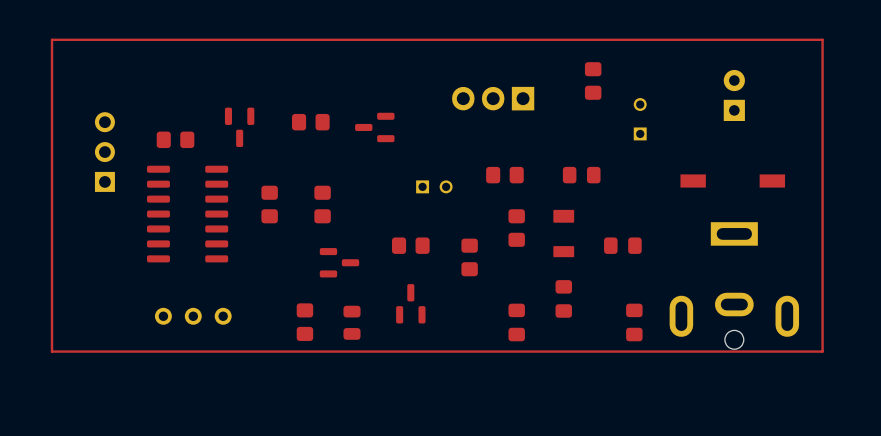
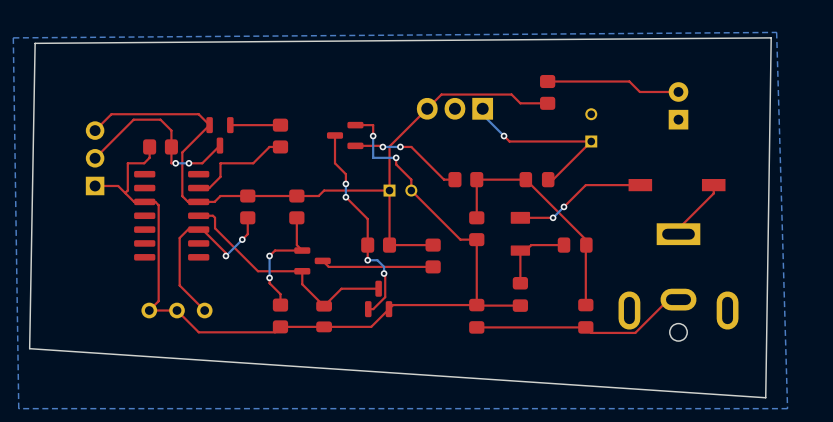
bottom zone outline: none -> (776, 32) (13, 37) (18, 408) (787, 408) (776, 32)
board edge: none -> (771, 37) (765, 397) (29, 348) (35, 43) (771, 37)
top track: (822, 39) (52, 39) (52, 351) (822, 351) (822, 39) -> none
top track: none -> (547, 81) (629, 81) (639, 91) (678, 91)
top track: none -> (547, 103) (520, 103) (511, 94) (441, 94) (389, 146) (389, 245) (433, 245)
bottom track: none -> (482, 108) (482, 114) (504, 136)
top track: none -> (280, 125) (230, 125)
top track: none -> (355, 125) (373, 125) (373, 136)
top track: none -> (95, 130) (111, 114) (198, 114) (209, 125) (182, 152) (182, 196) (188, 201) (214, 201) (220, 196) (318, 196) (324, 190) (389, 190)
part rotation: 0° (310, 122) -> 90° clockwise (280, 136)
top track: none -> (335, 135) (335, 163) (345, 174) (345, 183)
bottom track: none -> (373, 136) (373, 157) (396, 157)
via: none -> (373, 136)
top track: none -> (504, 136) (509, 141) (591, 141) (553, 179) (548, 179)
via: none -> (504, 136)
top track: none -> (219, 145) (202, 163) (188, 163)
top track: none -> (355, 145) (382, 147)
top track: none -> (149, 146) (149, 157) (144, 163) (127, 163) (127, 190) (125, 193)
top track: none -> (280, 146) (269, 146) (253, 163) (220, 163) (220, 176) (209, 188) (198, 188)
via: none -> (382, 147)
top track: none -> (400, 146) (411, 146) (444, 179) (454, 179)
bottom track: none -> (400, 146) (382, 146)
via: none -> (400, 146)
top track: none -> (396, 157) (396, 164) (411, 179) (411, 190) (460, 239) (476, 239) (476, 305)
via: none -> (396, 157)
top track: none -> (95, 158) (133, 119) (160, 119) (171, 130) (171, 163) (175, 163)
via: none -> (175, 163)
bottom track: none -> (188, 163) (175, 163)
via: none -> (188, 163)
bottom track: none -> (345, 183) (345, 197)
via: none -> (345, 183)
top track: none -> (640, 185) (585, 185) (564, 206)
top track: none -> (713, 185) (713, 193) (678, 228) (678, 234)
top track: none -> (95, 185) (118, 185) (134, 201) (155, 201) (158, 205) (158, 301) (149, 310) (176, 310) (198, 332) (275, 332) (280, 326) (371, 326) (393, 305) (476, 305)
top track: none -> (345, 197) (367, 219) (367, 260)
via: none -> (345, 197)
bottom track: none -> (564, 206) (553, 217)
via: none -> (564, 206)
top track: none -> (198, 215) (212, 215) (215, 217) (215, 228) (257, 271) (302, 271) (302, 284) (324, 306) (341, 288) (378, 288)
top track: none -> (247, 217) (247, 234) (242, 239)
top track: none -> (296, 217) (296, 245) (302, 250) (275, 250) (269, 255)
top track: none -> (476, 217) (476, 179) (525, 179) (586, 240) (585, 305)
top track: none -> (553, 217) (520, 217)
via: none -> (553, 217)
bottom track: none -> (242, 239) (225, 255)
via: none -> (242, 239)
top track: none -> (564, 245) (531, 245) (525, 250) (520, 250) (520, 283)
top track: none -> (225, 255) (225, 253) (202, 229) (188, 229) (179, 238) (179, 285) (204, 310)
via: none -> (225, 255)
bottom track: none -> (269, 255) (269, 277)
via: none -> (269, 255)
top track: none -> (322, 260) (328, 266) (433, 266)
bottom track: none -> (367, 260) (377, 260) (384, 266) (384, 273)
via: none -> (367, 260)
top track: none -> (384, 273) (385, 297) (373, 309) (368, 309)
via: none -> (384, 273)
top track: none -> (269, 277) (269, 283) (280, 294) (280, 305)
via: none -> (269, 277)
top track: none -> (678, 299) (668, 299) (635, 332) (591, 332) (585, 327) (476, 327)
top track: none -> (476, 305) (520, 305)

